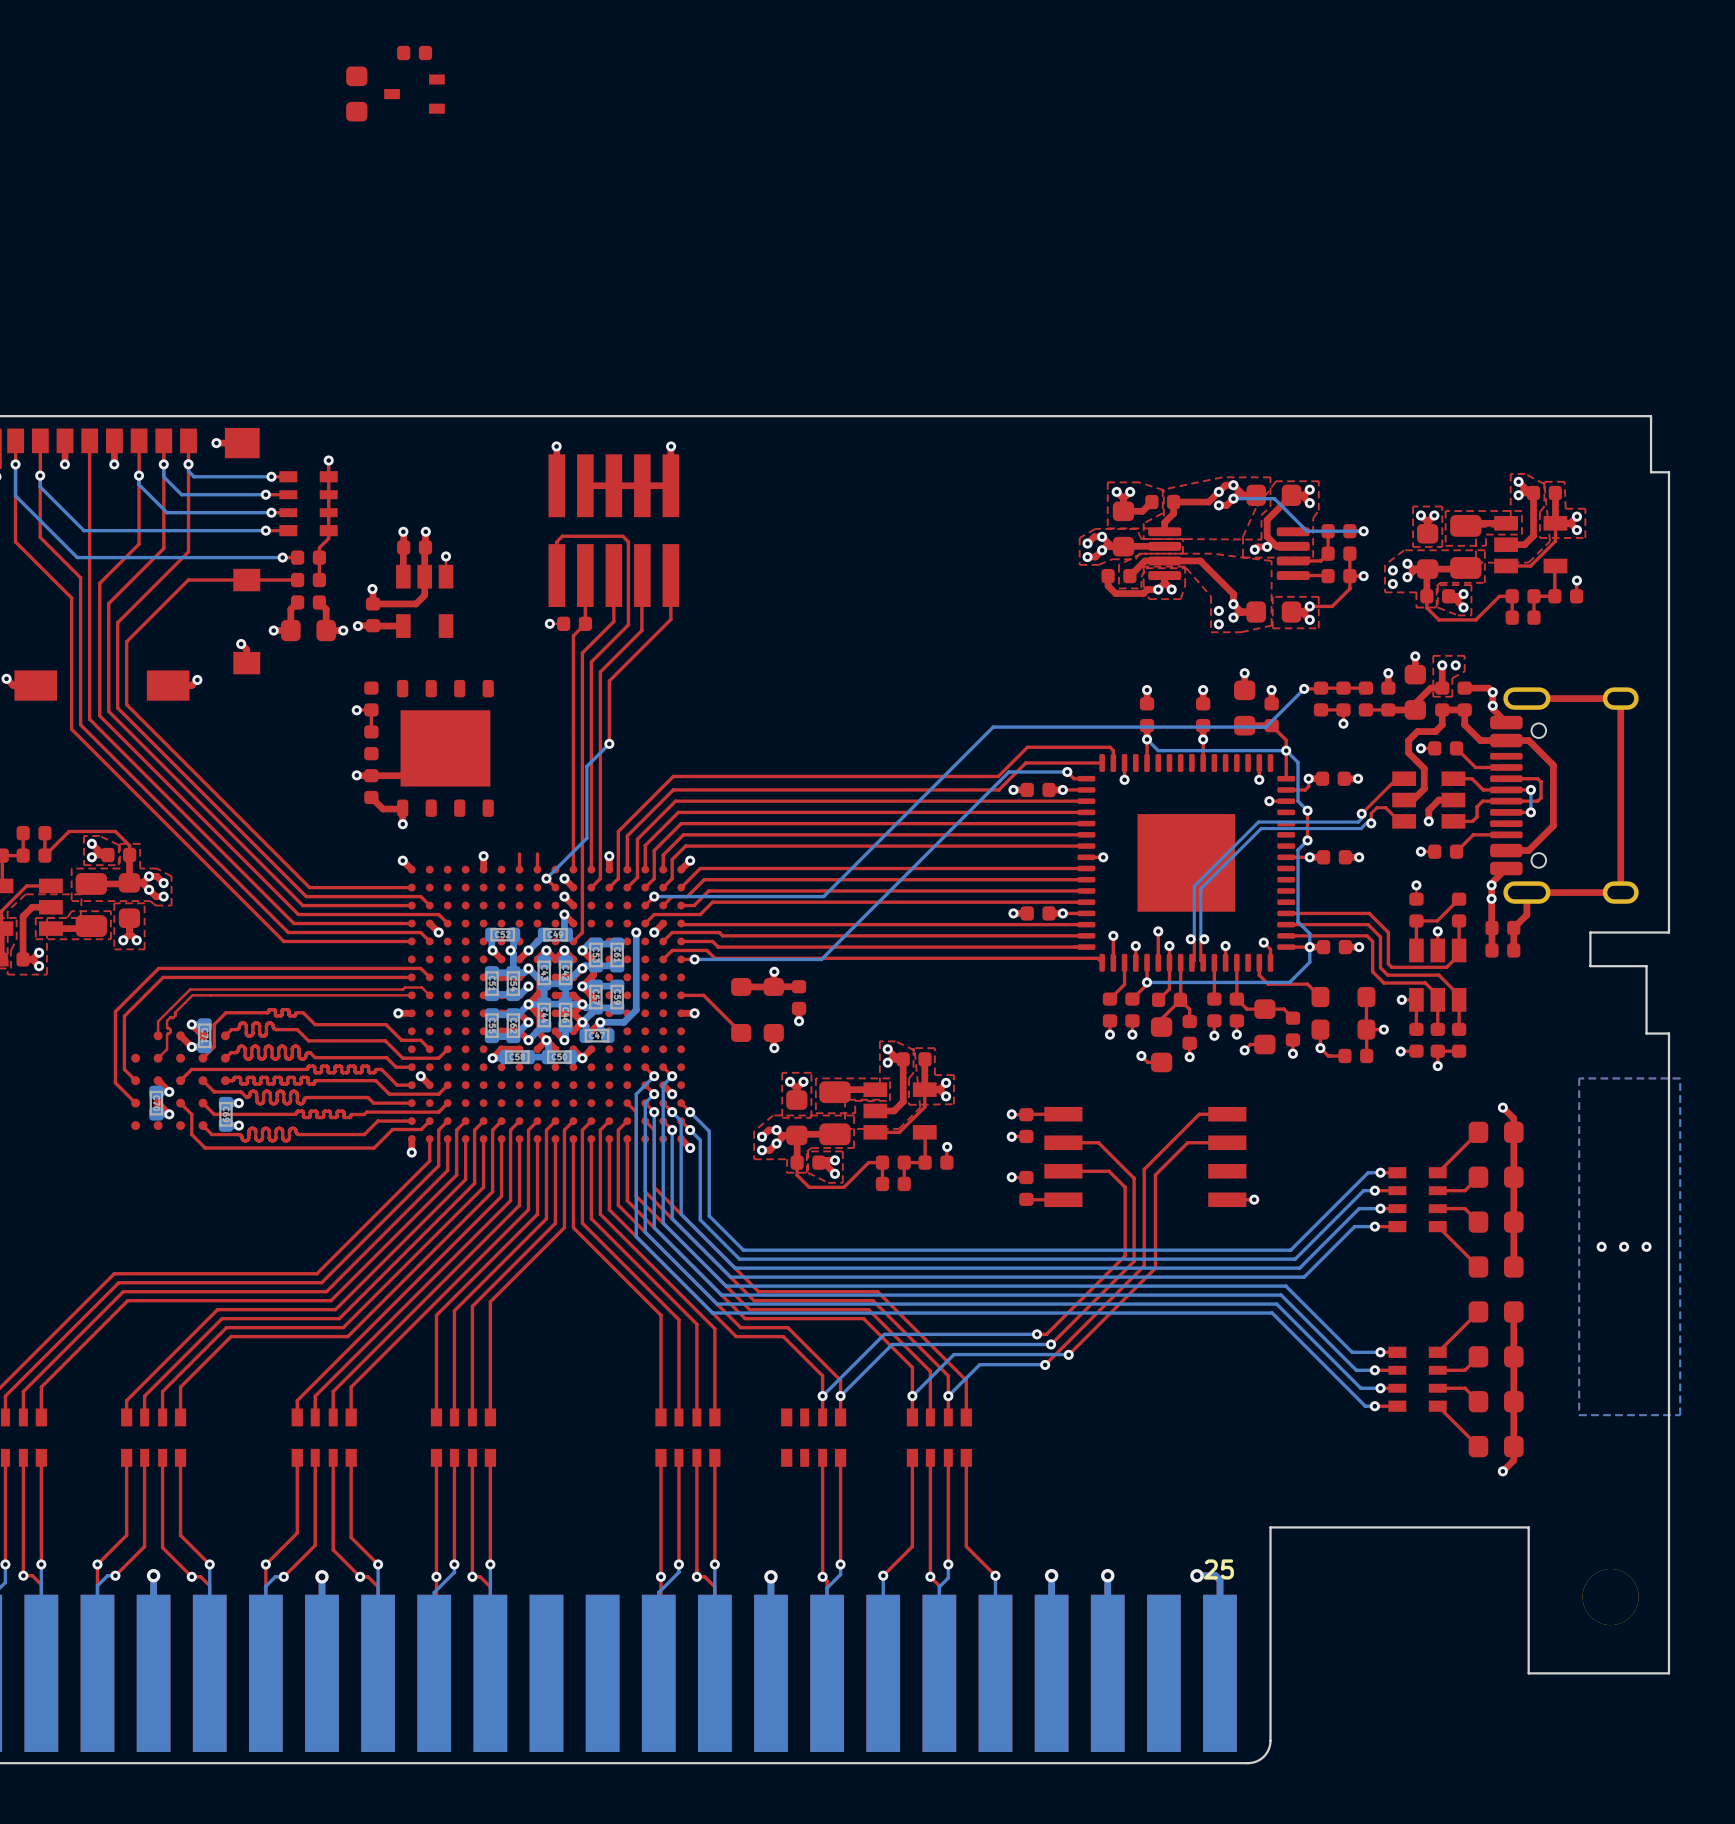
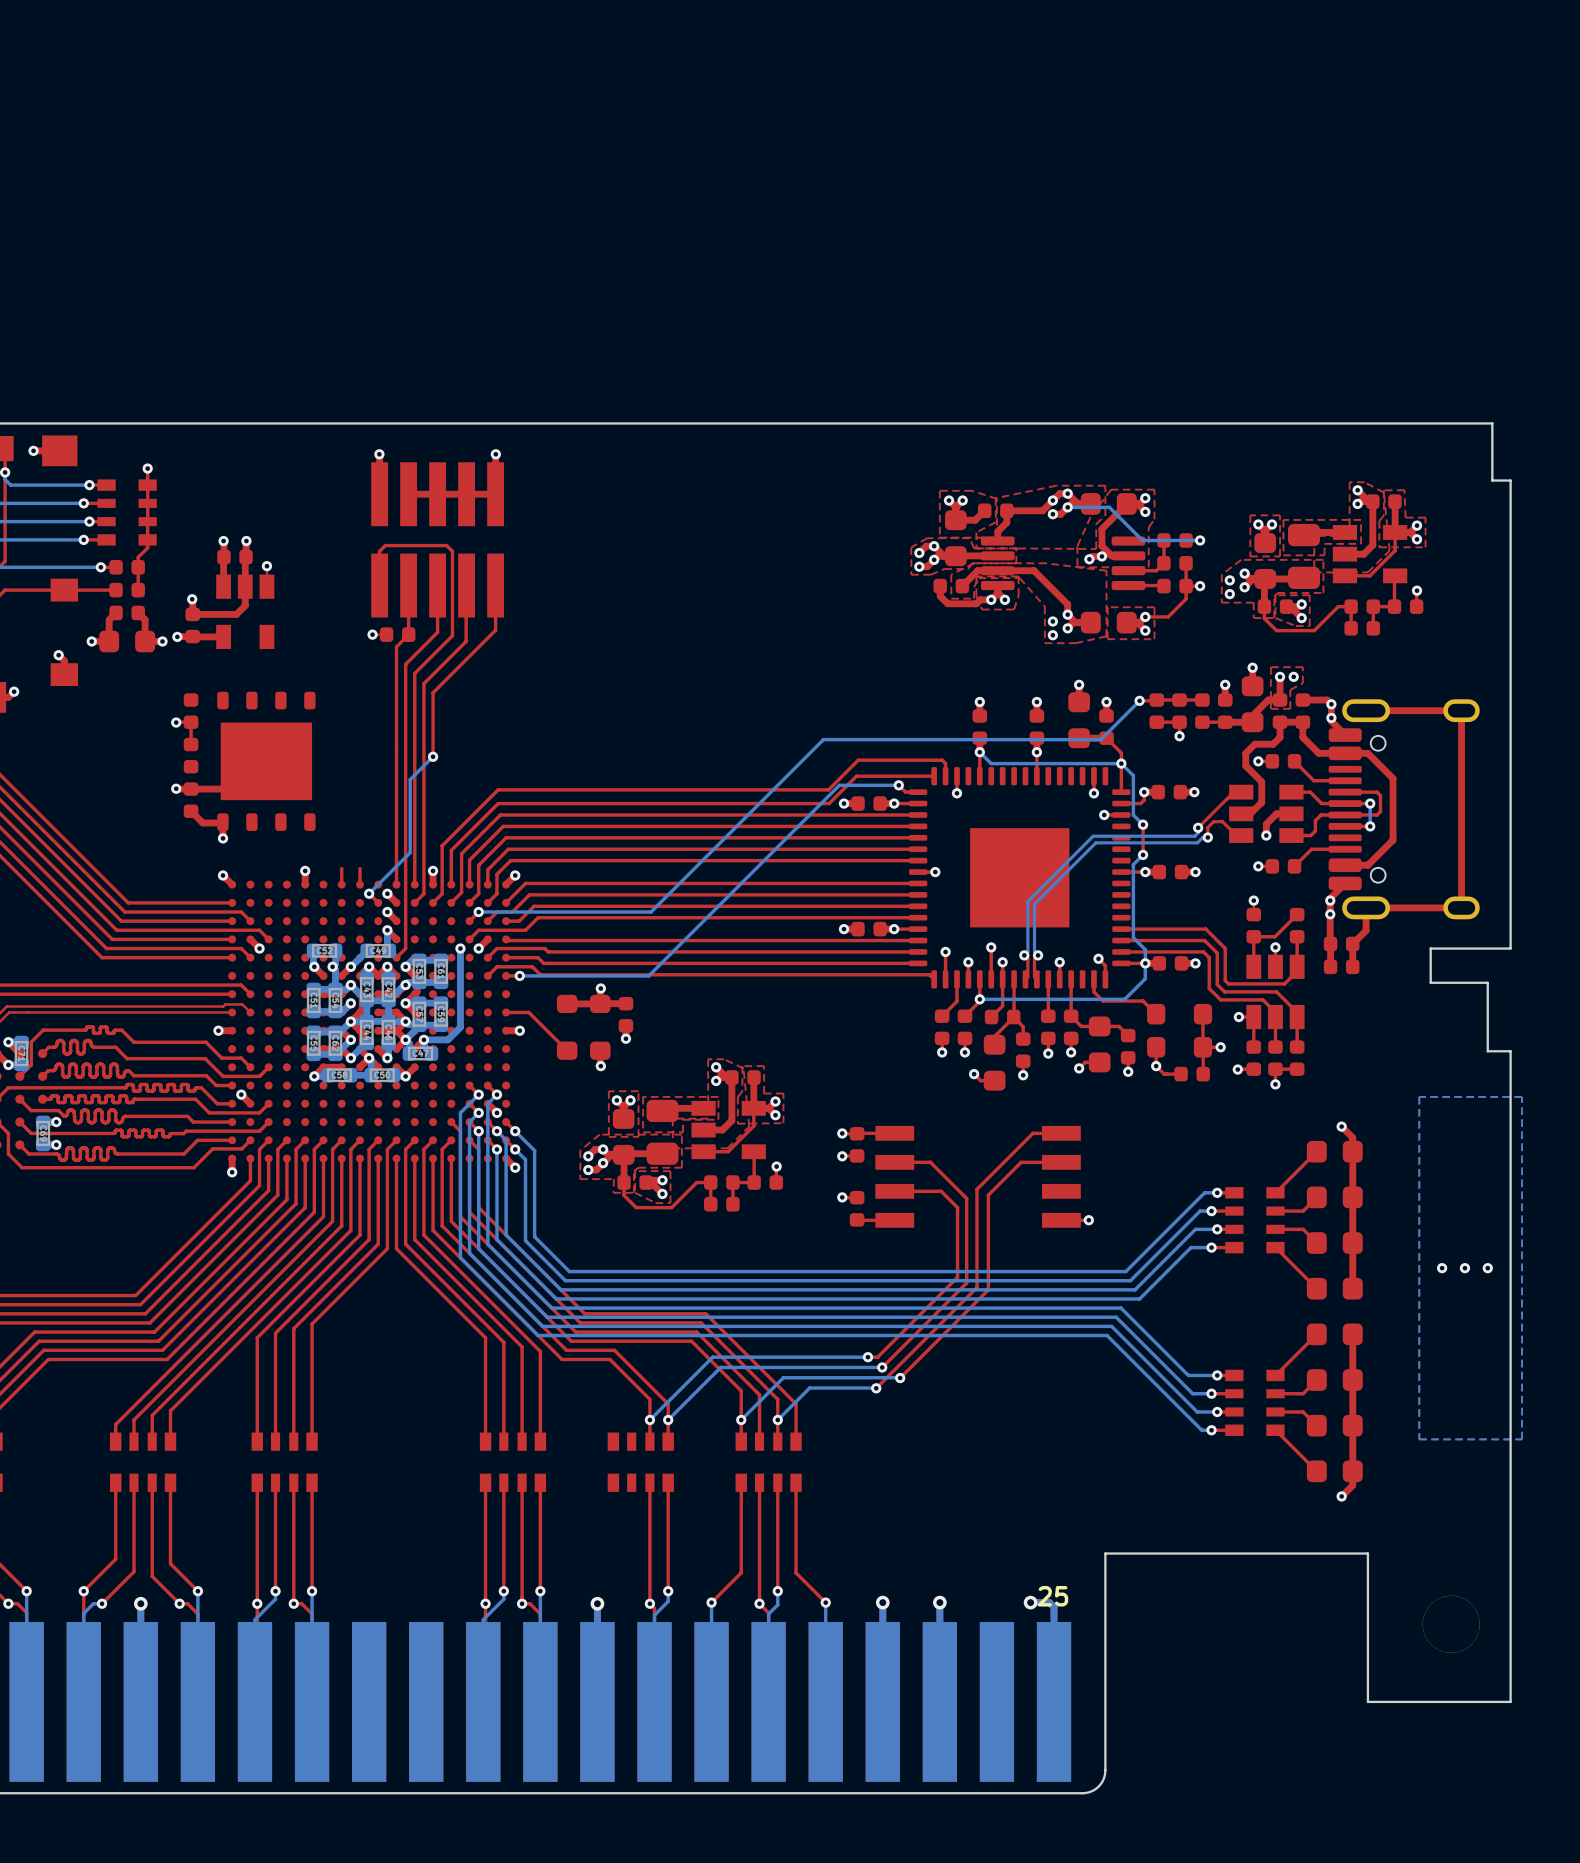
part: (414, 53) -> none
part: (356, 93) -> none
part: (414, 94) -> none

